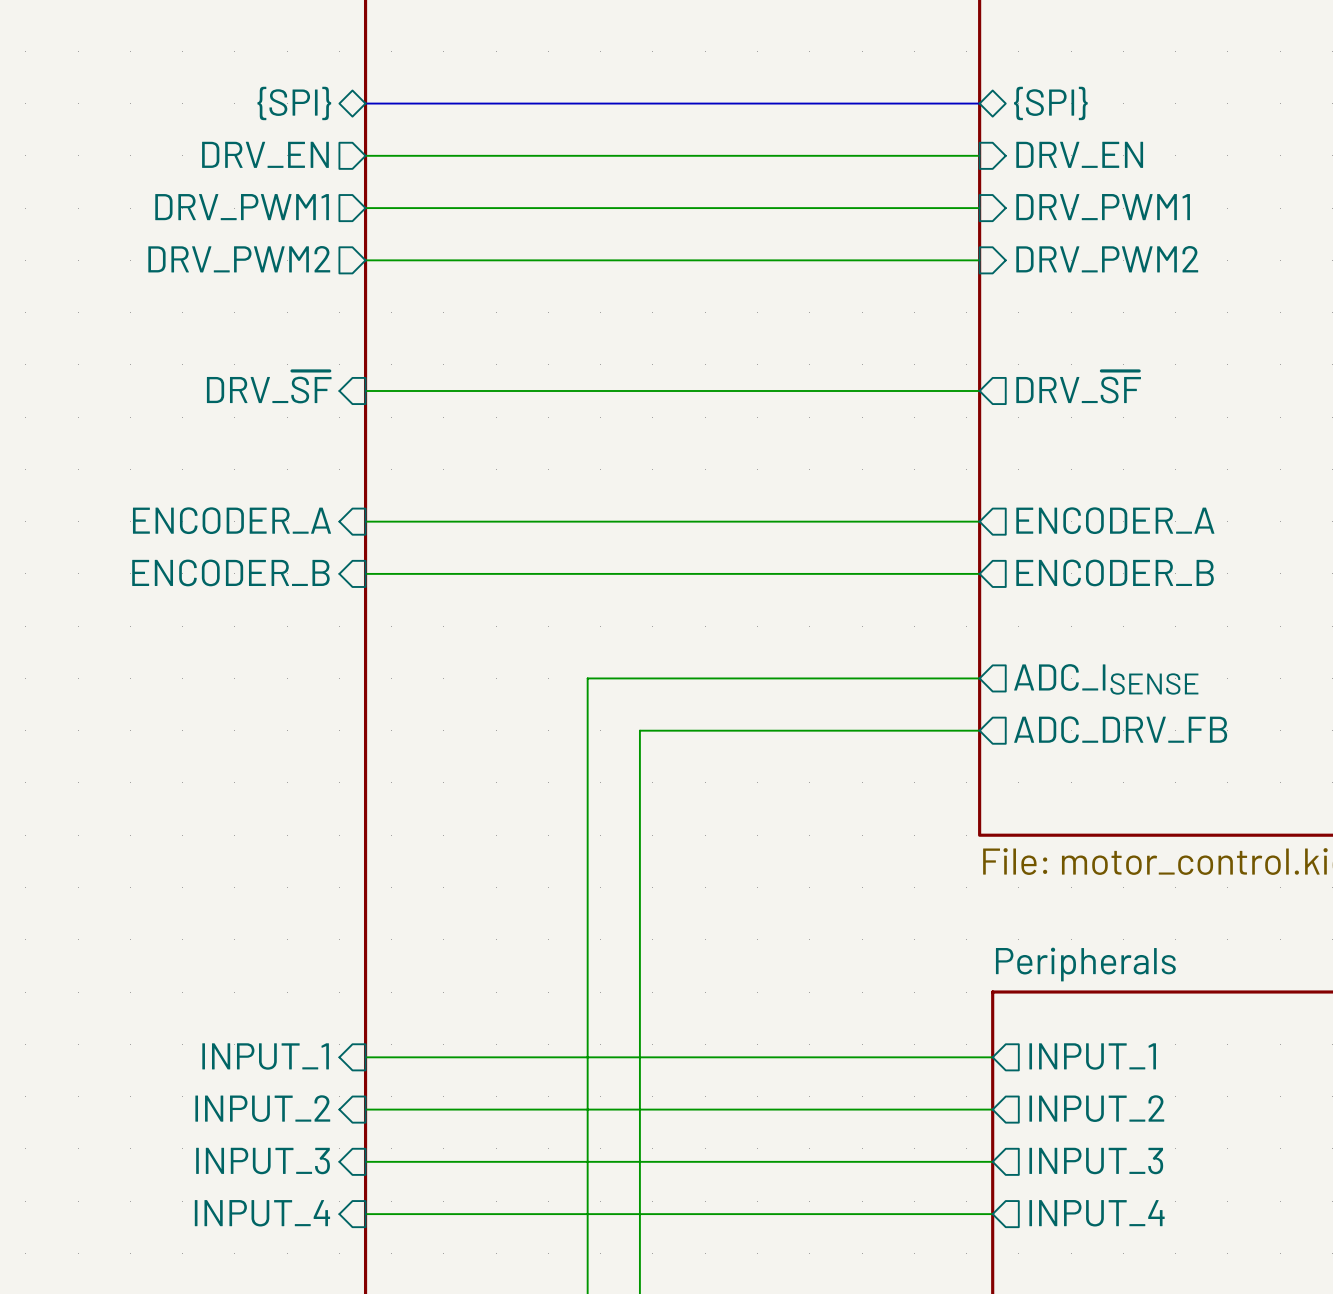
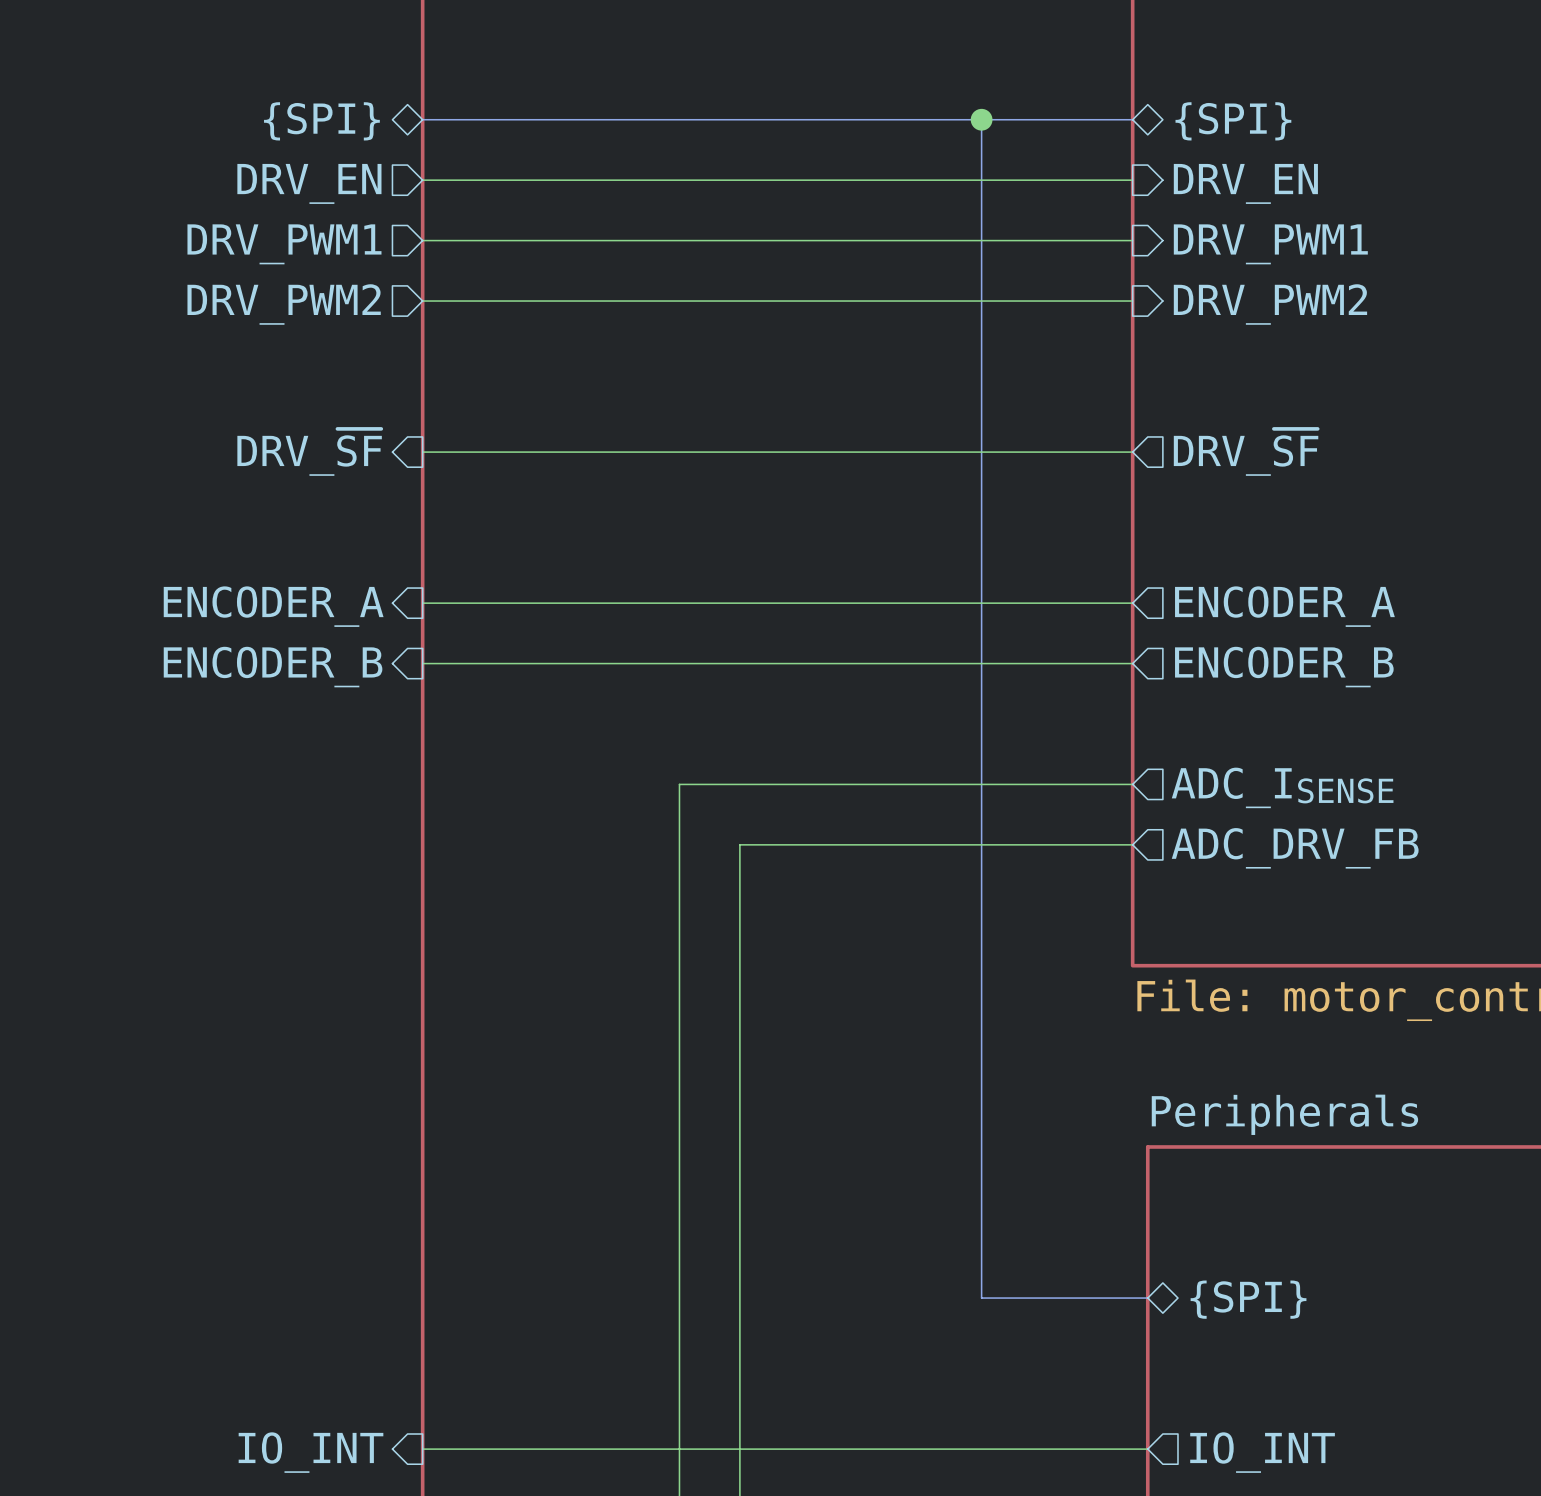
bus: none -> (981, 119) (981, 1298) (1147, 1298)
junction: none -> (981, 119)
sheet pin: INPUT_1 (265, 1056) -> none
sheet pin: INPUT_1 (1092, 1056) -> none
wire: (365, 1057) (992, 1057) -> none
sheet pin: INPUT_2 (262, 1108) -> none
sheet pin shape: output (1096, 1108) -> bidirectional (1248, 1299)
sheet pin: INPUT_2 (1096, 1108) -> {SPI} (1248, 1299)
wire: (365, 1109) (992, 1109) -> none
sheet pin: INPUT_3 (263, 1161) -> none
wire: (365, 1161) (992, 1161) -> none
sheet pin: INPUT_3 (1096, 1161) -> none
sheet pin: INPUT_4 (262, 1213) -> none
sheet pin: INPUT_4 (1097, 1213) -> none
wire: (365, 1214) (992, 1214) -> (422, 1449) (1147, 1449)
sheet pin: none -> IO_INT (311, 1452)
sheet pin: none -> IO_INT (1262, 1452)

